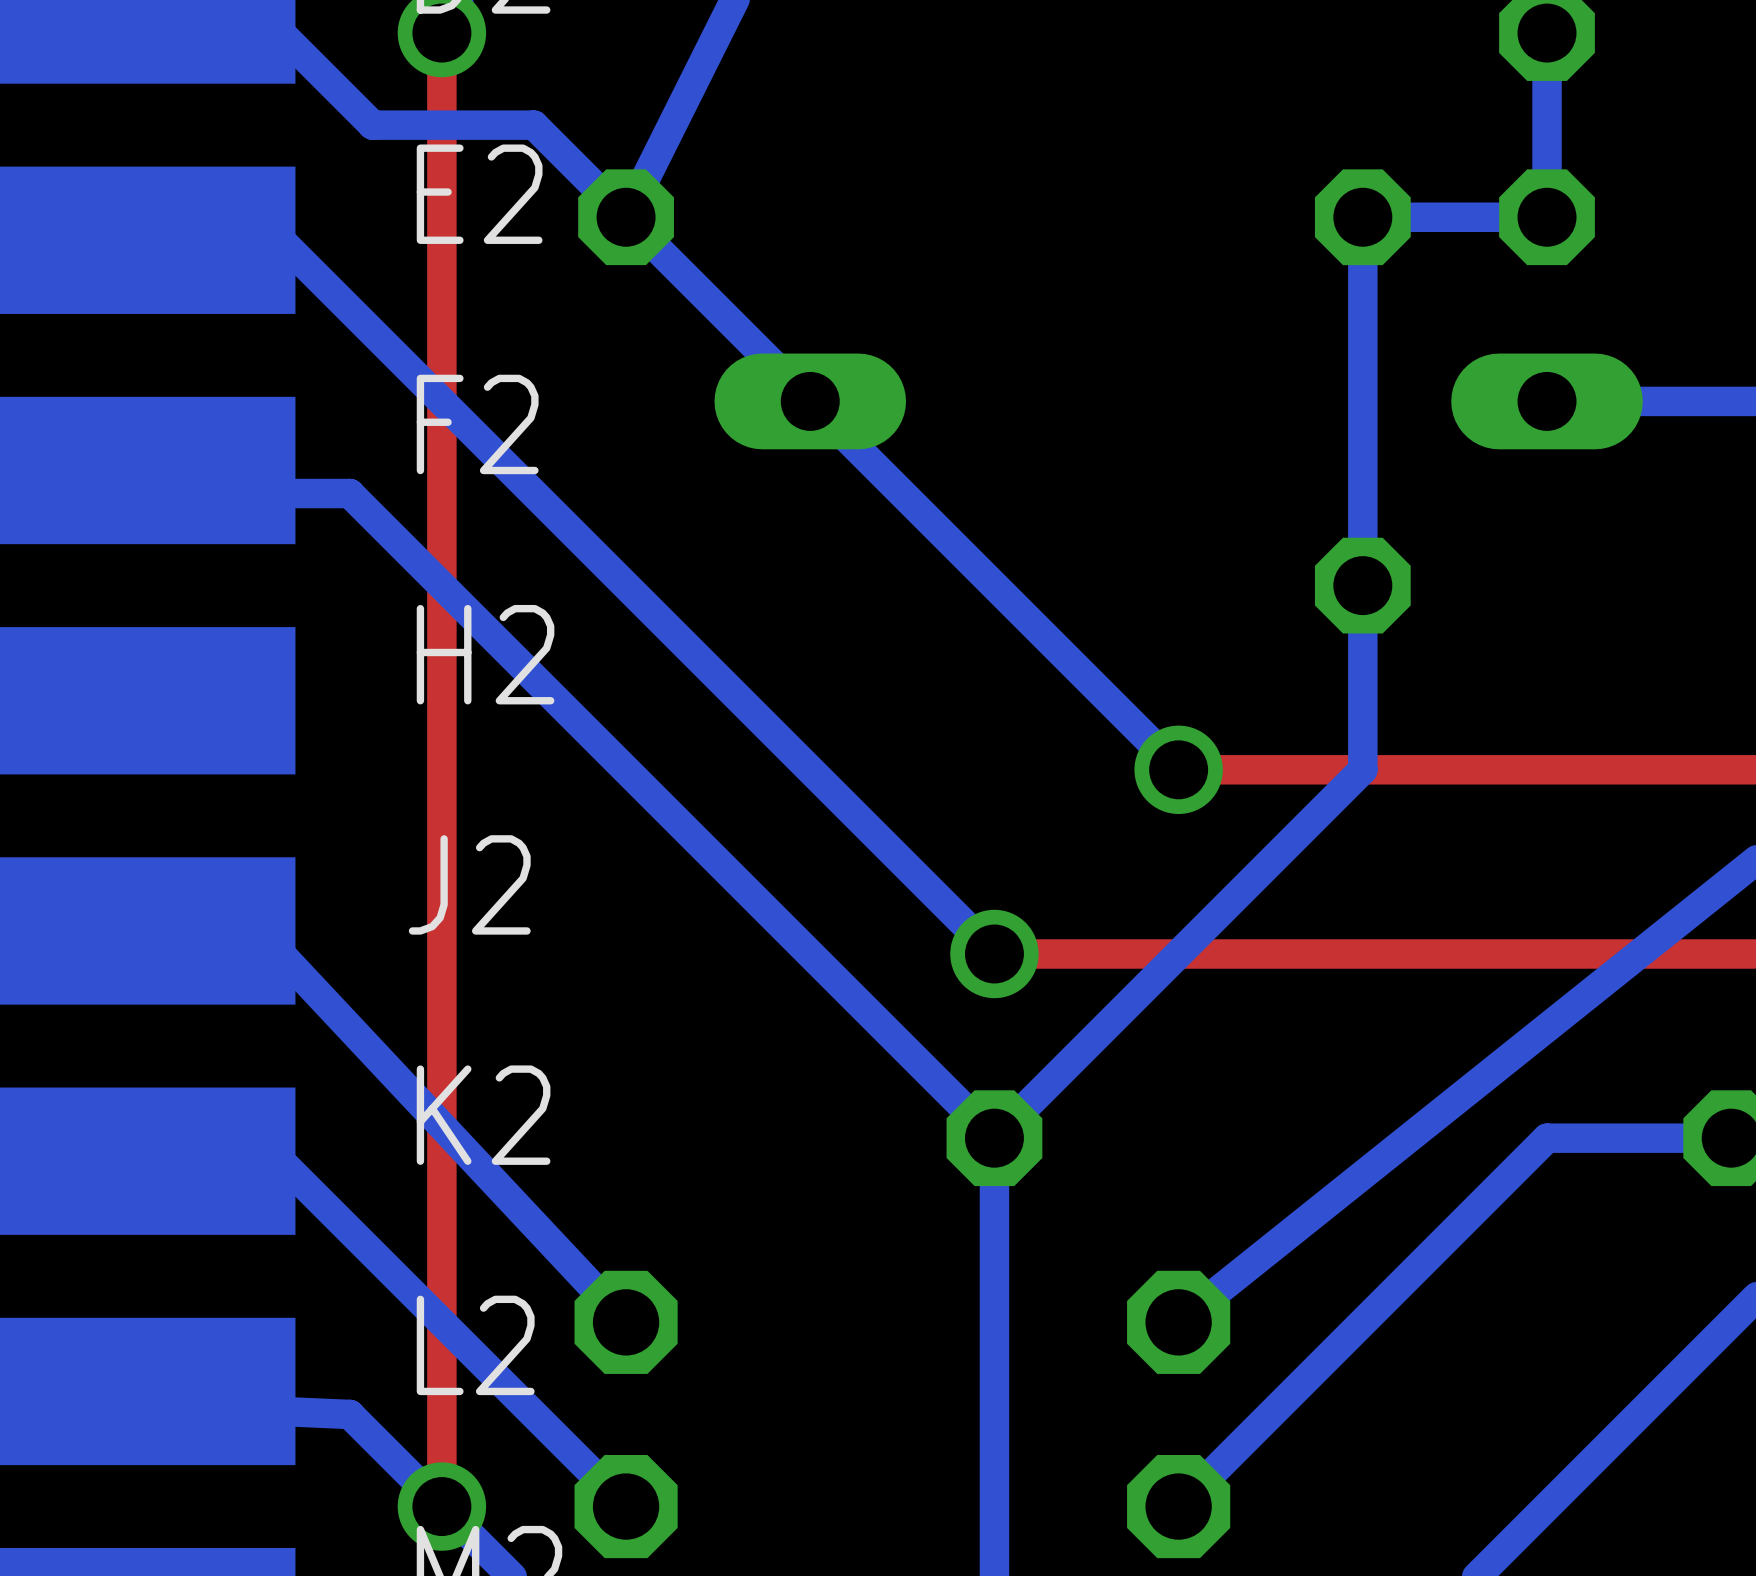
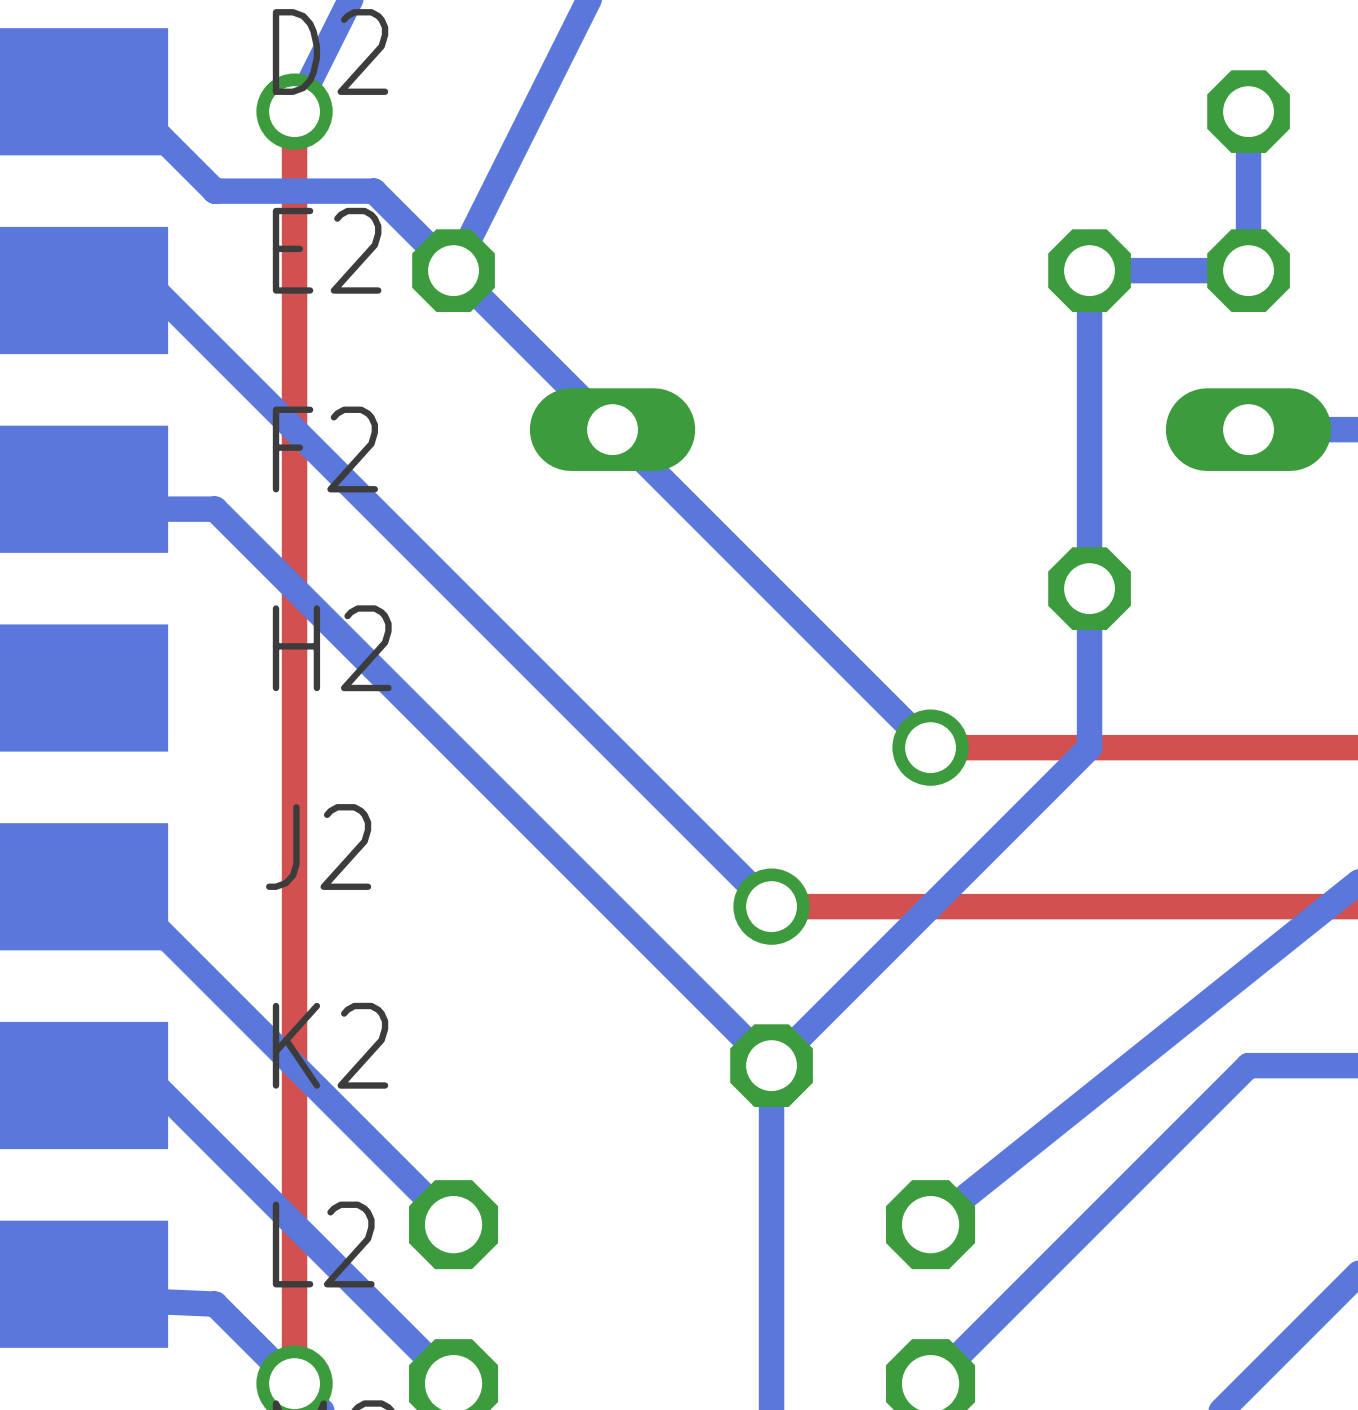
bottom track: (257, 33) (280, 33) (372, 125) -> (135, 111) (215, 191) (234, 191)
bottom track: (257, 953) (280, 953) (626, 1322) -> (135, 906) (453, 1224)

